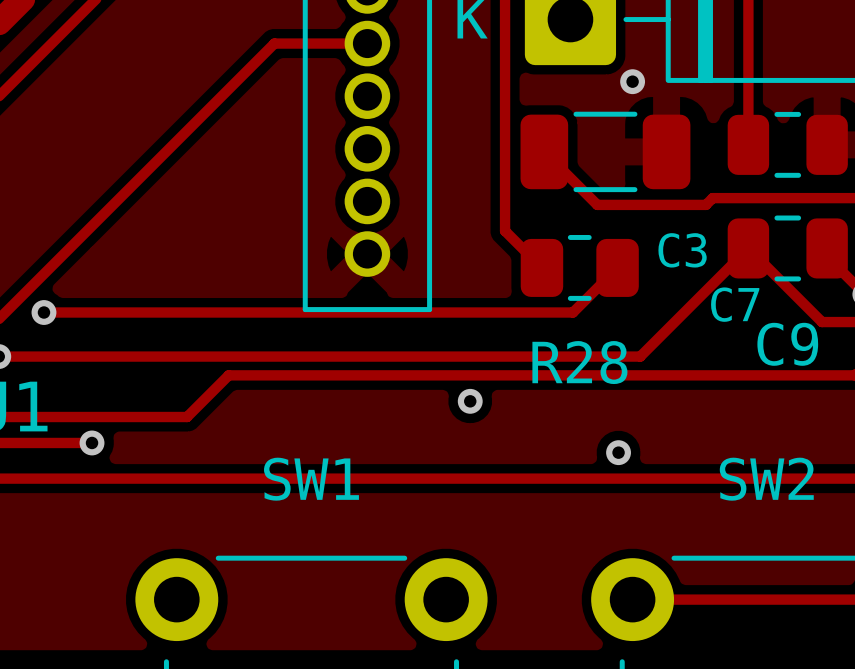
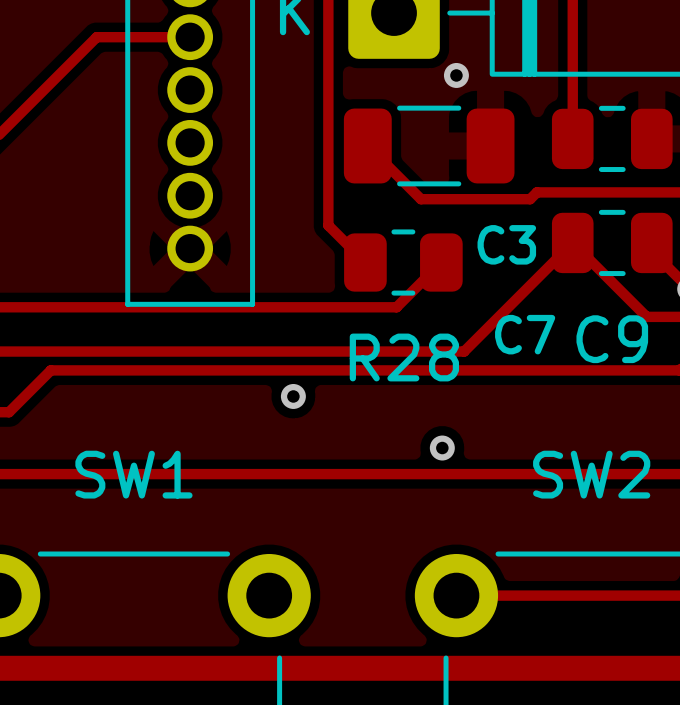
C7 name position: C7 (735, 304) -> C7 (525, 334)

